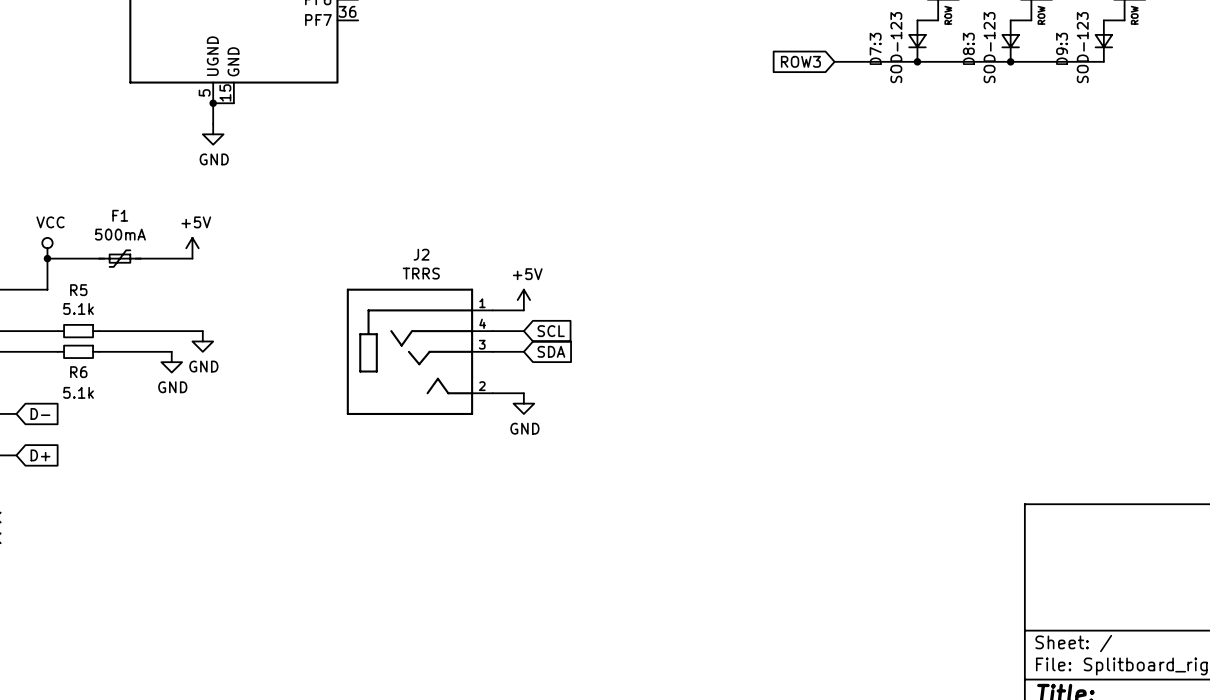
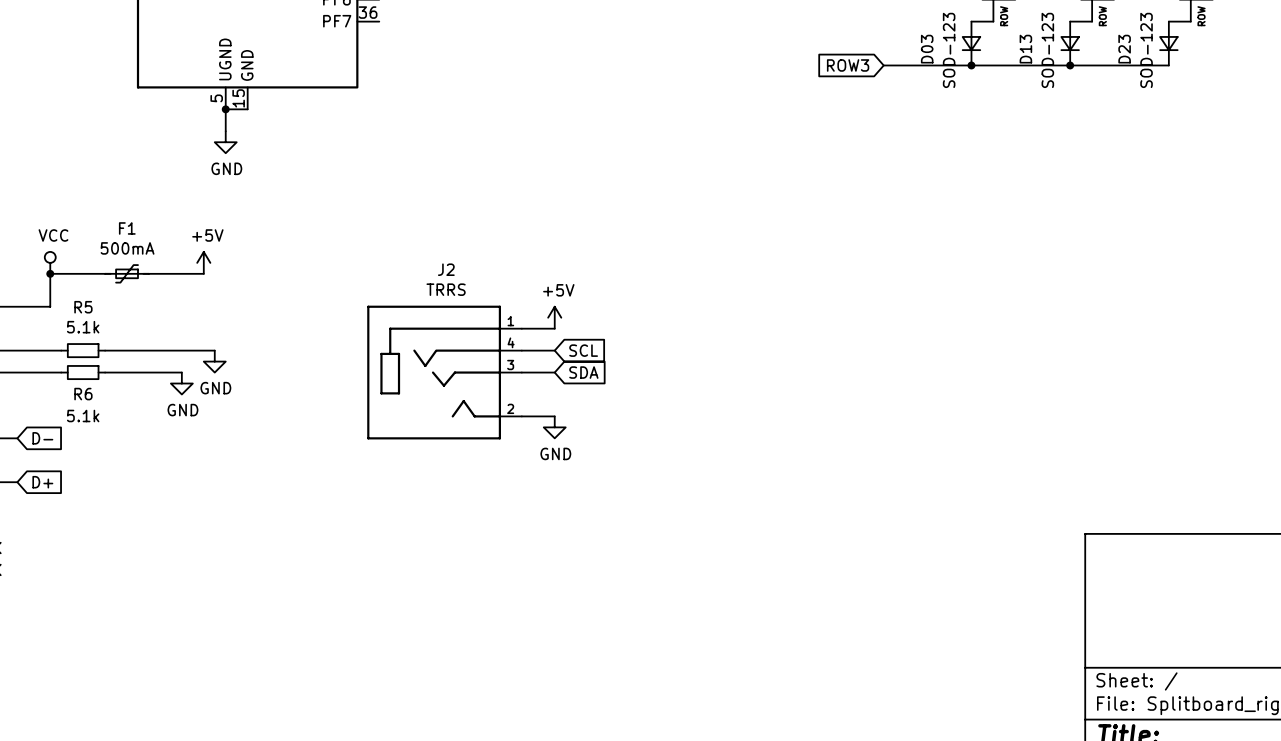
D03 name: D7:3 (875, 48) -> D03 (927, 49)
D13 name: D8:3 (968, 48) -> D13 (1025, 49)
D23 name: D9:3 (1062, 48) -> D23 (1124, 49)

